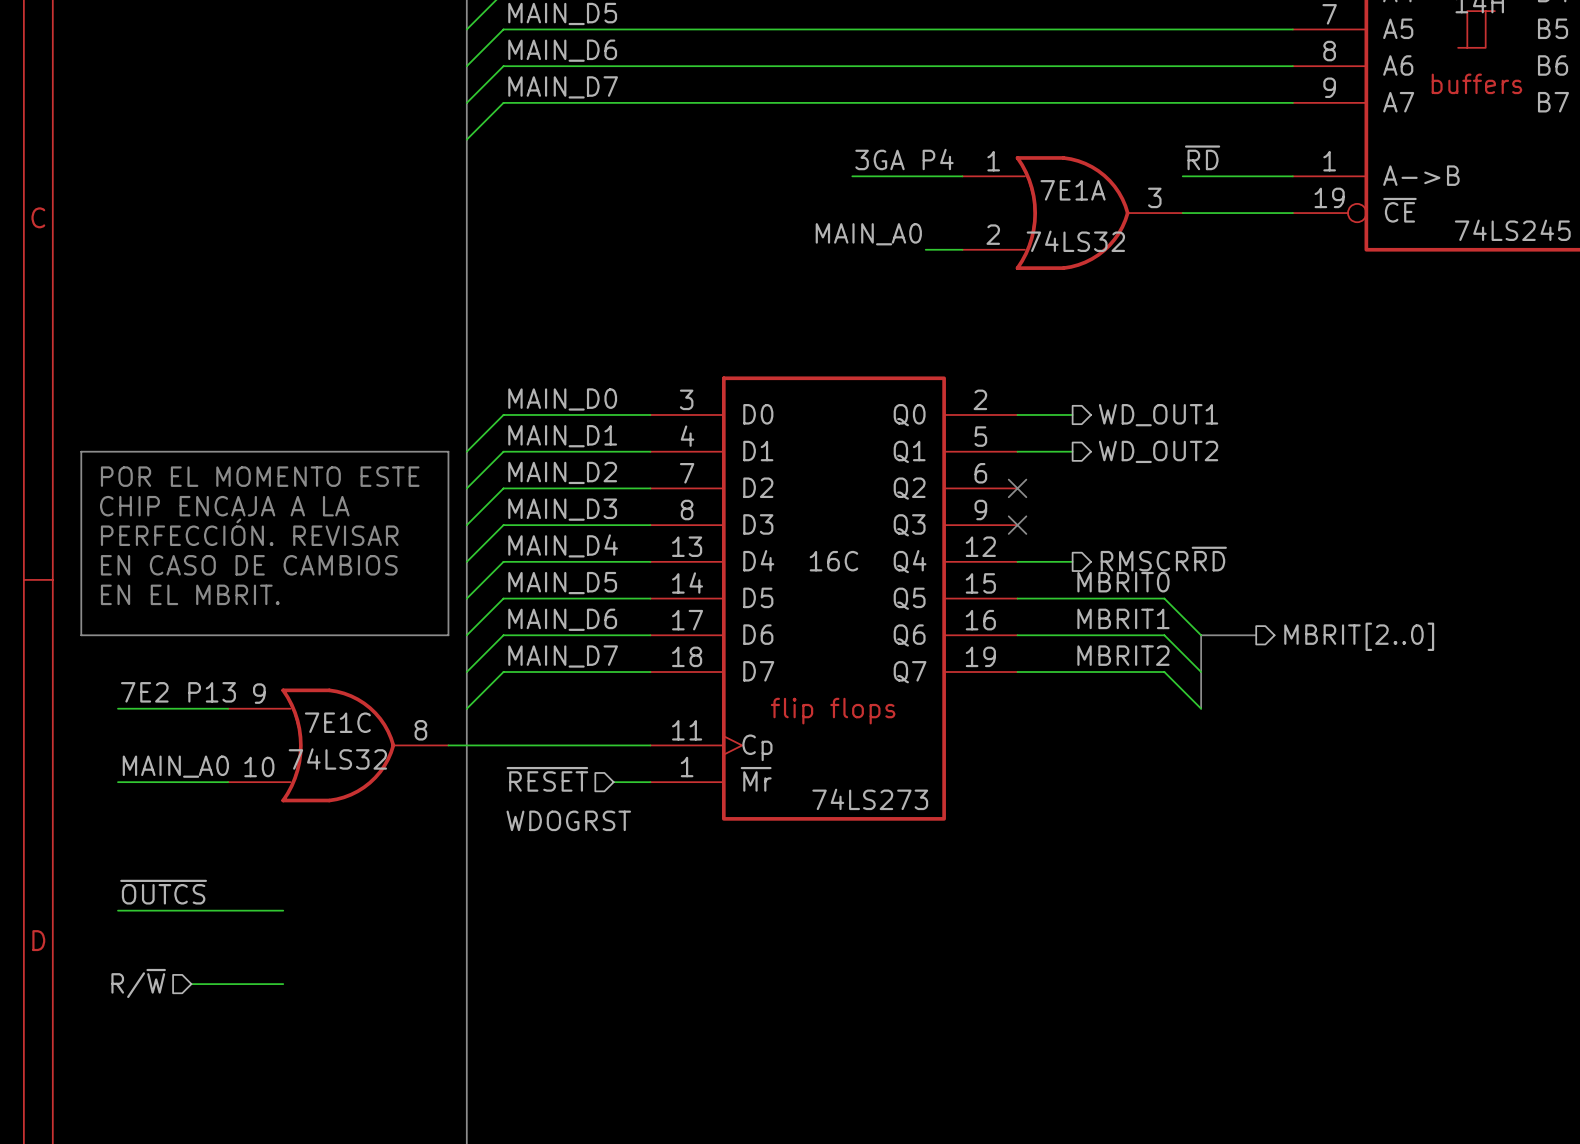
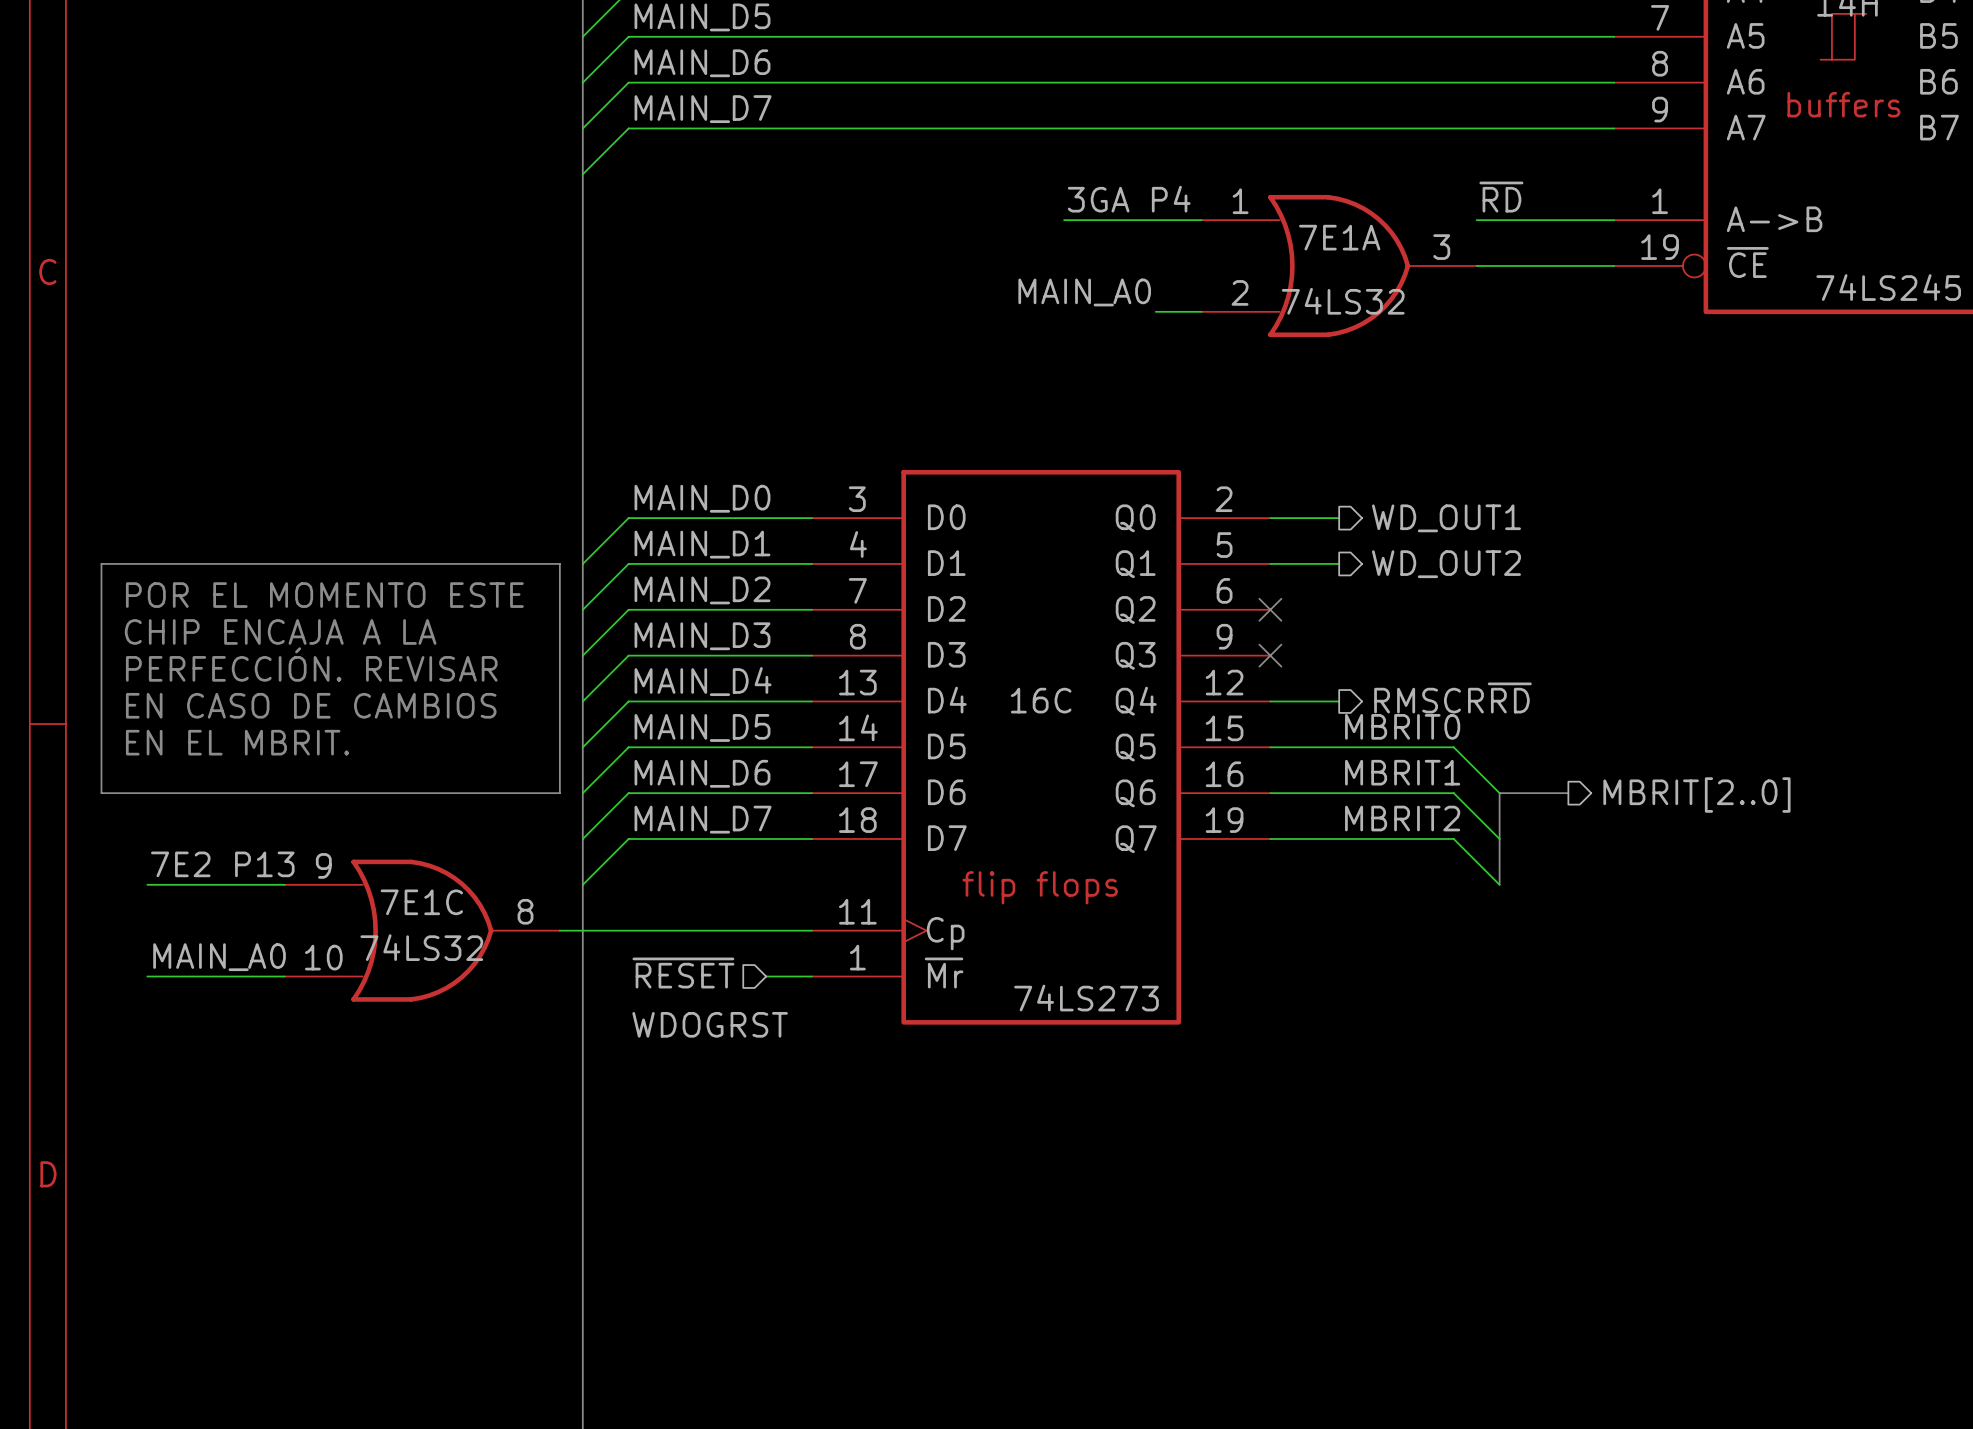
label: ~{OUTCS} (163, 892) -> none
wire: (118, 910) (283, 910) -> none
hierarchical label: R/~{W} (138, 983) -> none
wire: (191, 984) (283, 984) -> none

